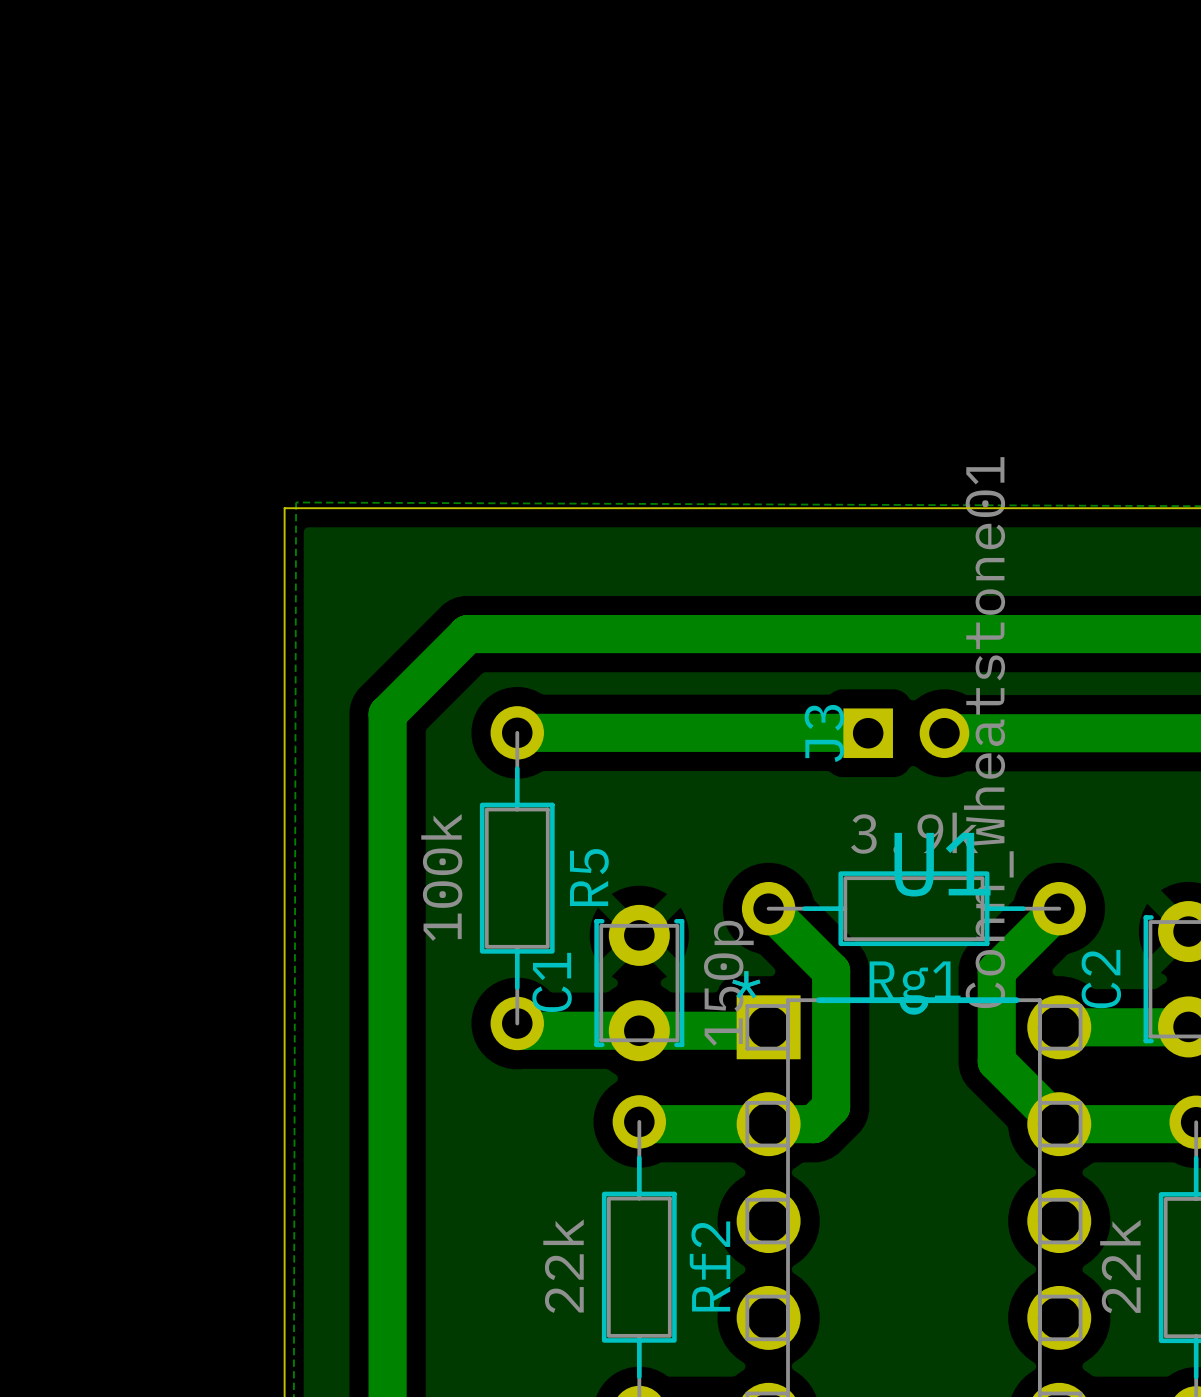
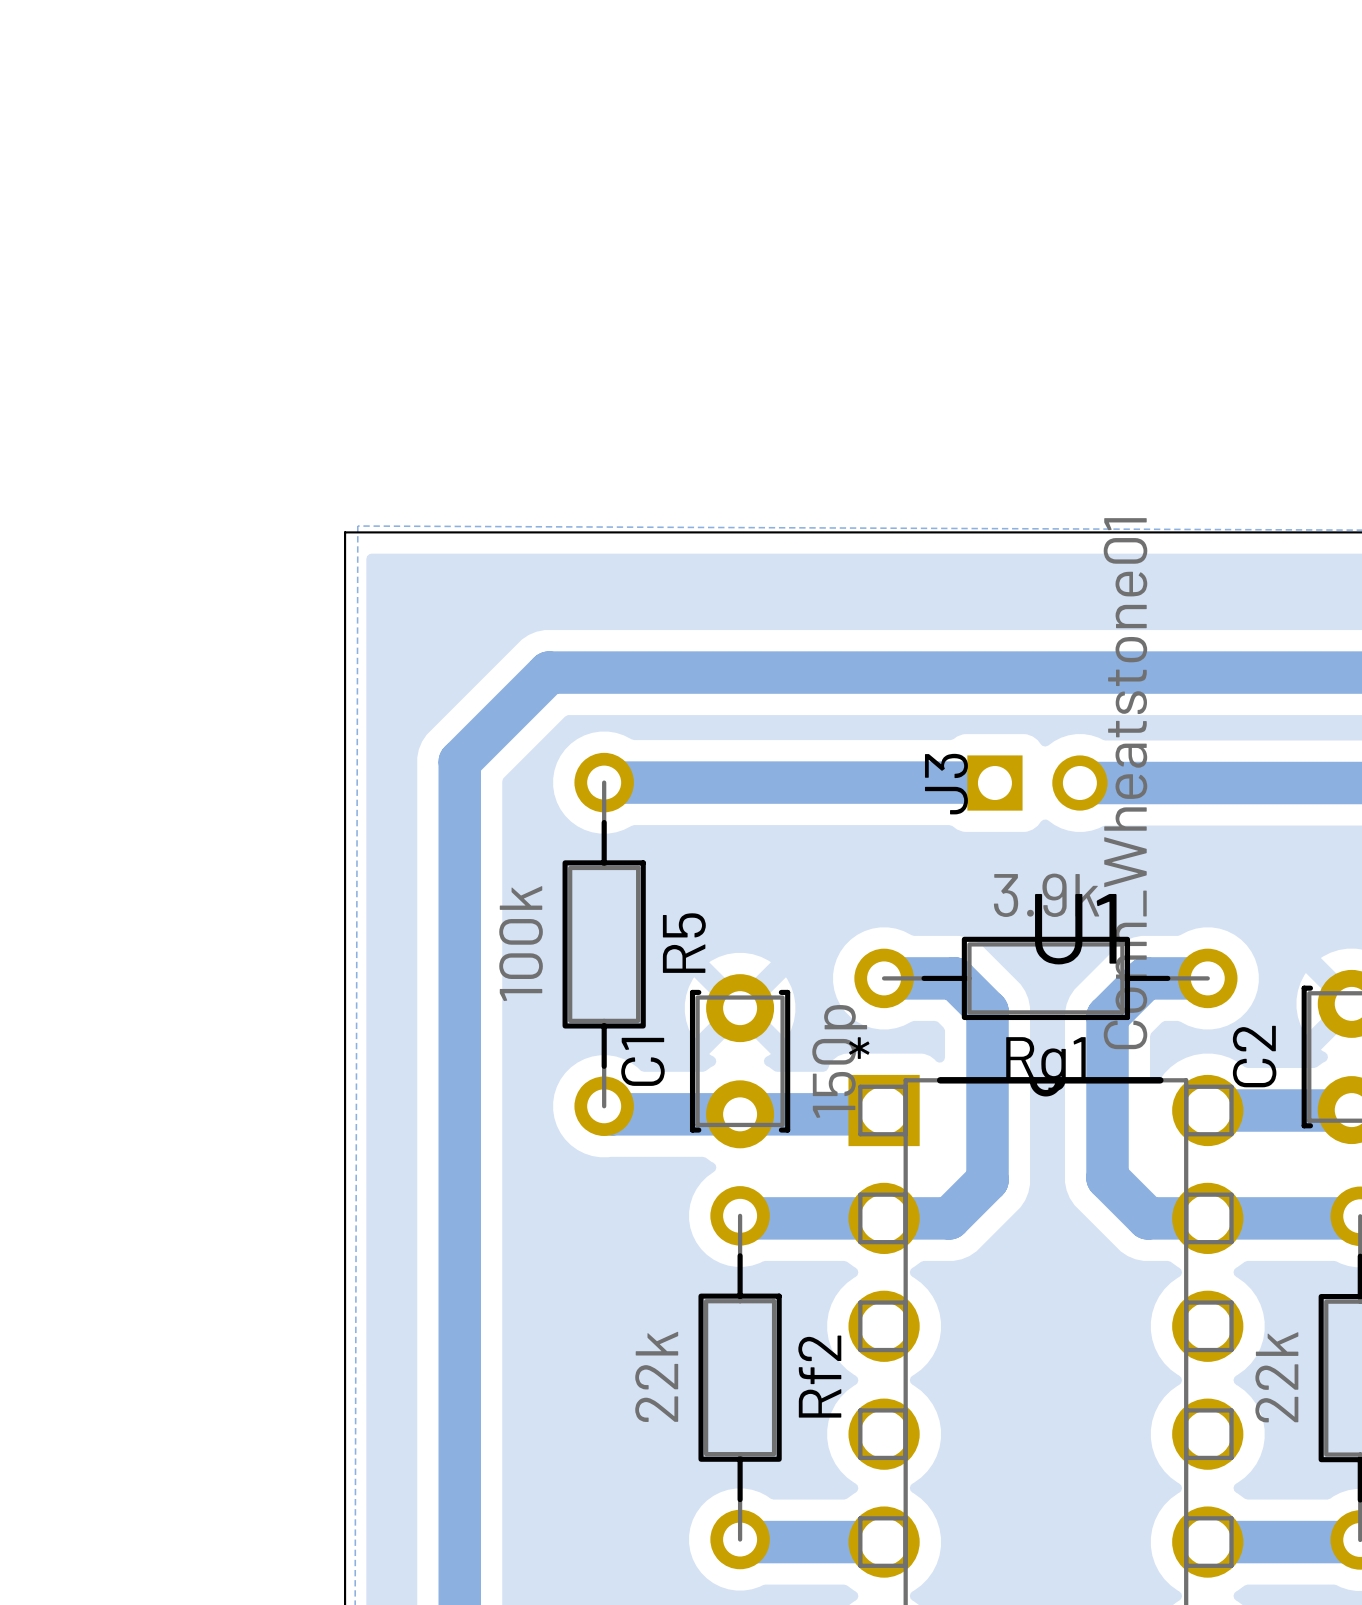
bottom track: (768, 908) (831, 971) (831, 1106) (813, 1124) -> (884, 978) (954, 978) (987, 1011) (987, 1180) (949, 1218) (934, 1218)
bottom track: (1059, 908) (996, 971) (996, 1061) (1059, 1124) -> (1207, 978) (1145, 978) (1107, 1016) (1107, 1178) (1147, 1218) (1207, 1218)

